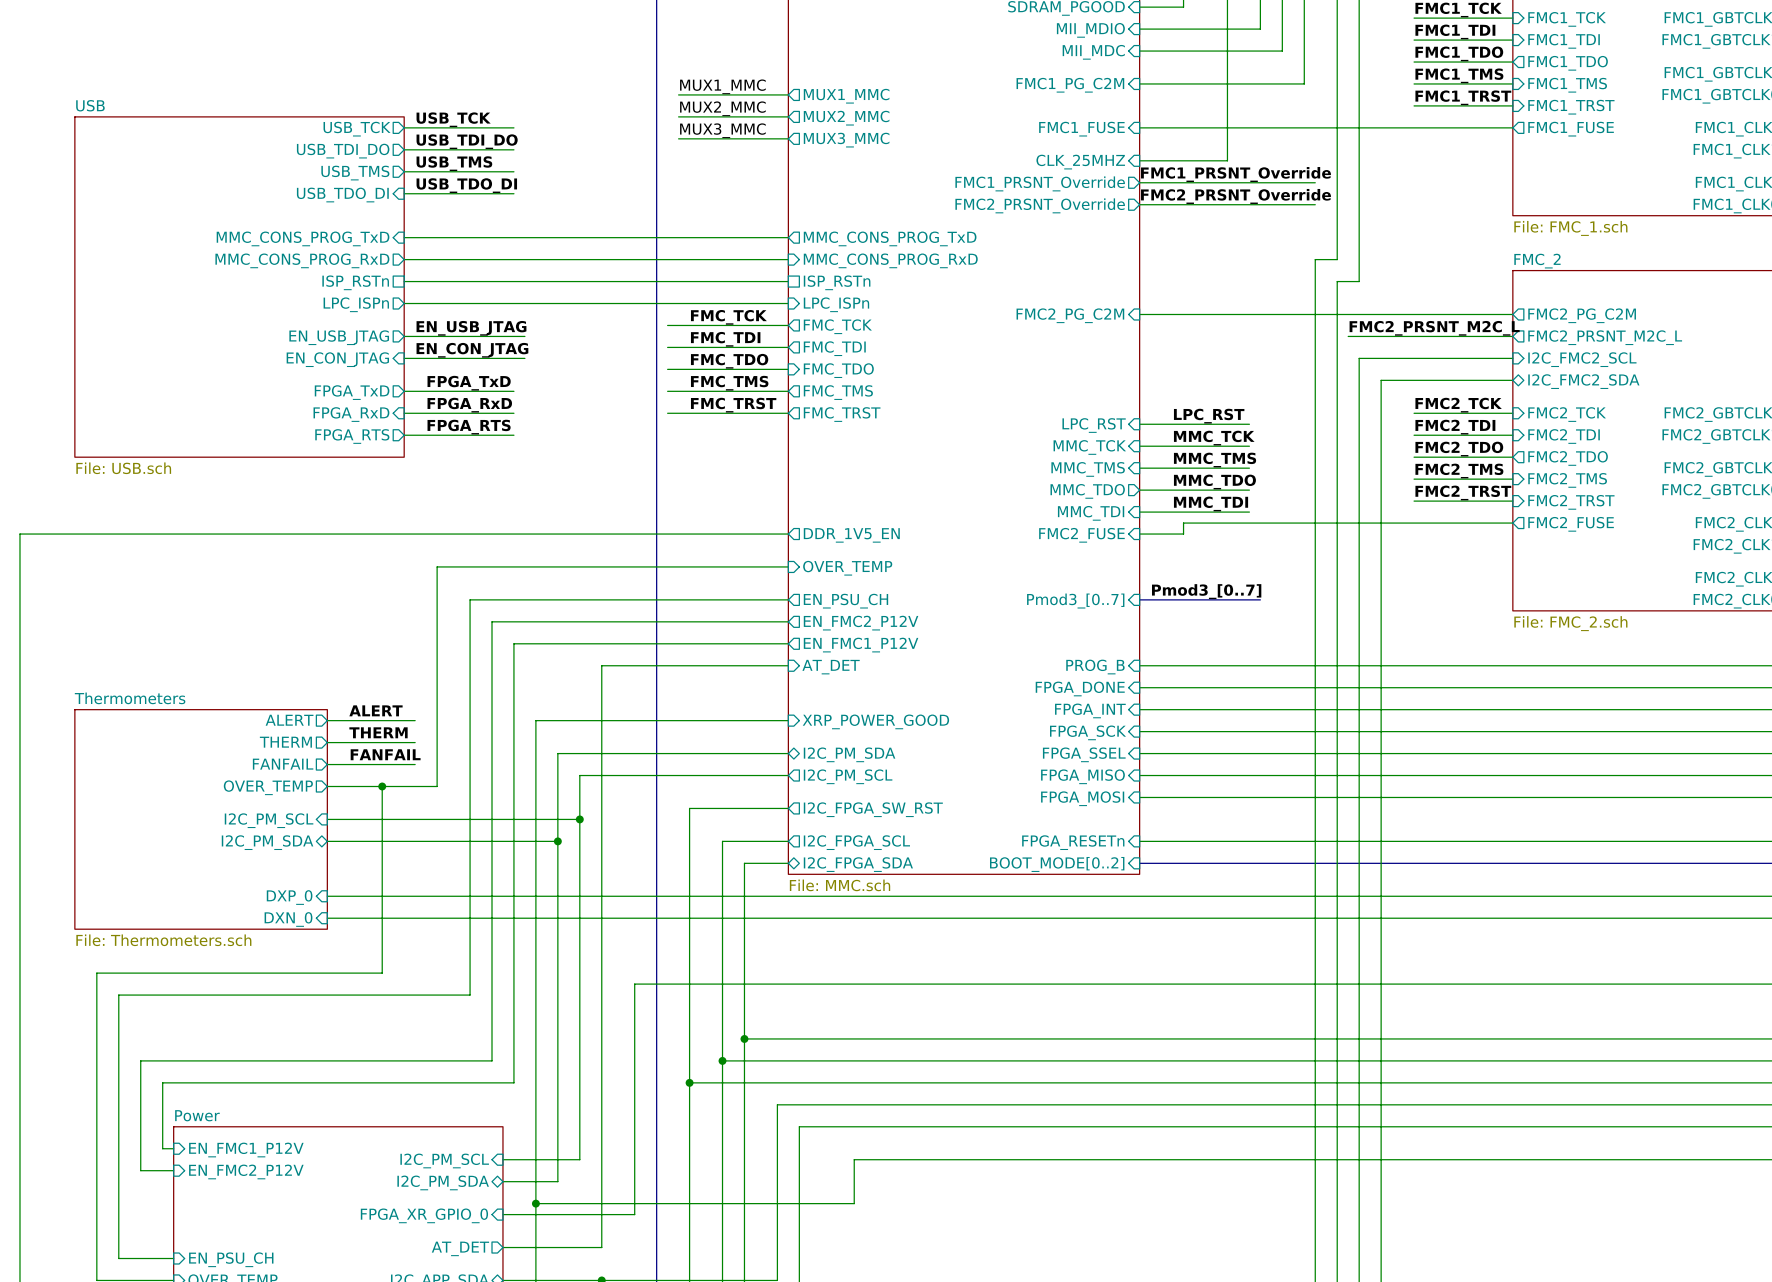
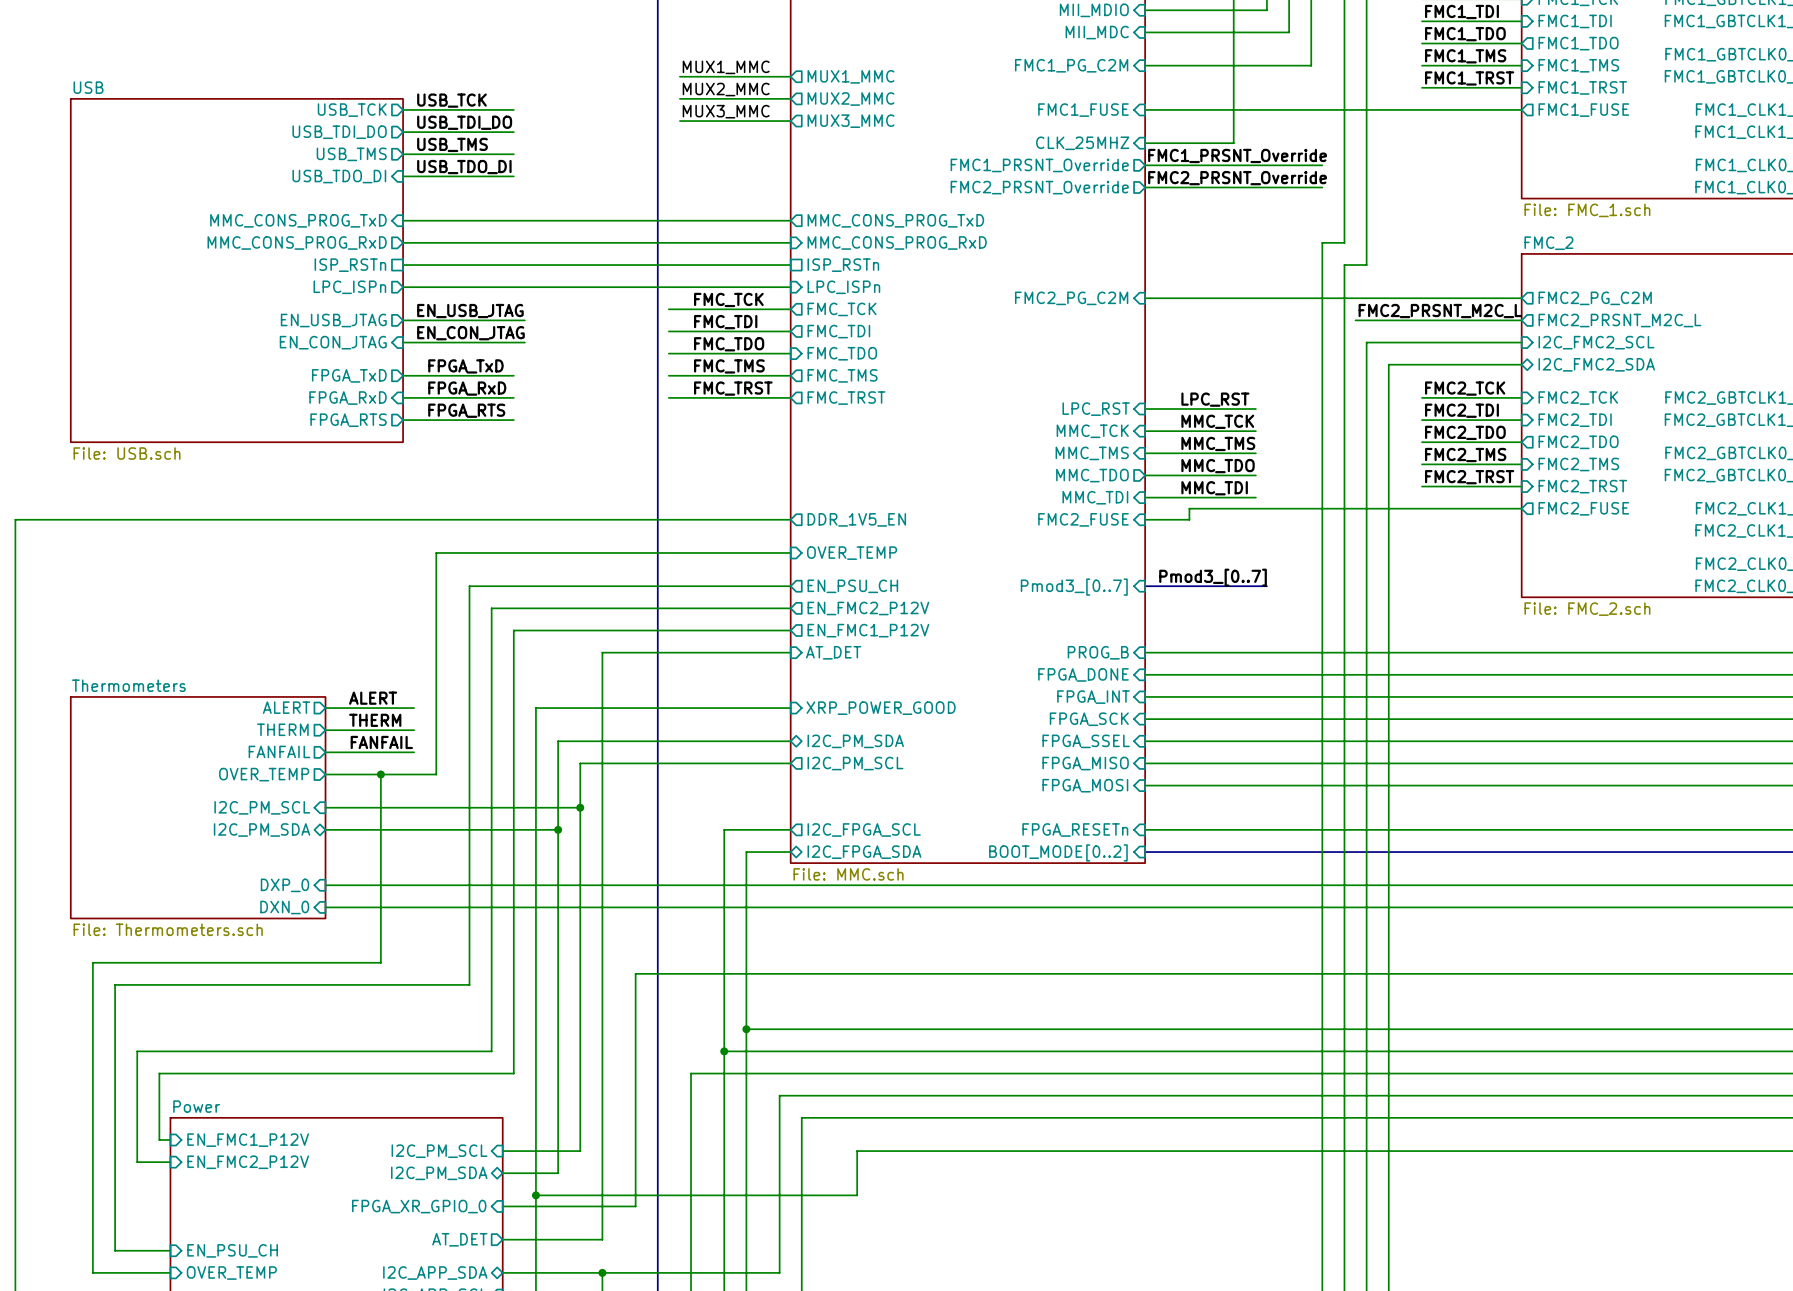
wire: (788, 808) (689, 808) (689, 1082) -> none
sheet pin: I2C_FPGA_SW_RST (873, 809) -> none
junction: (689, 1082) -> none

